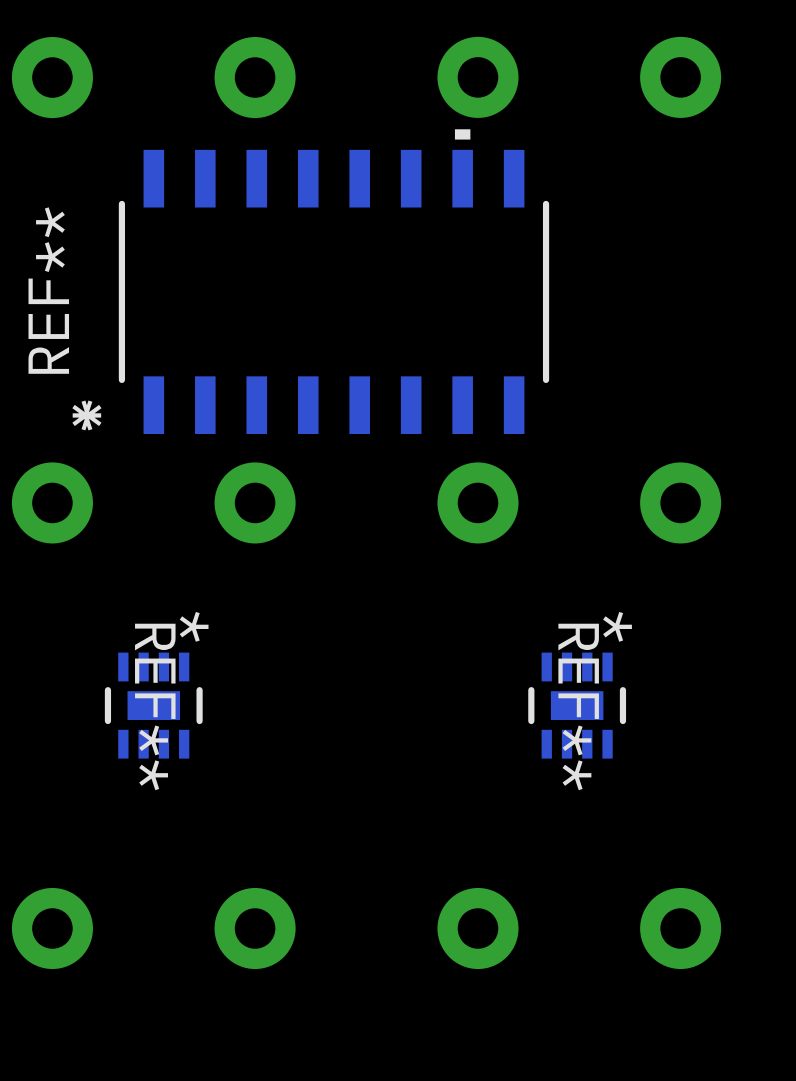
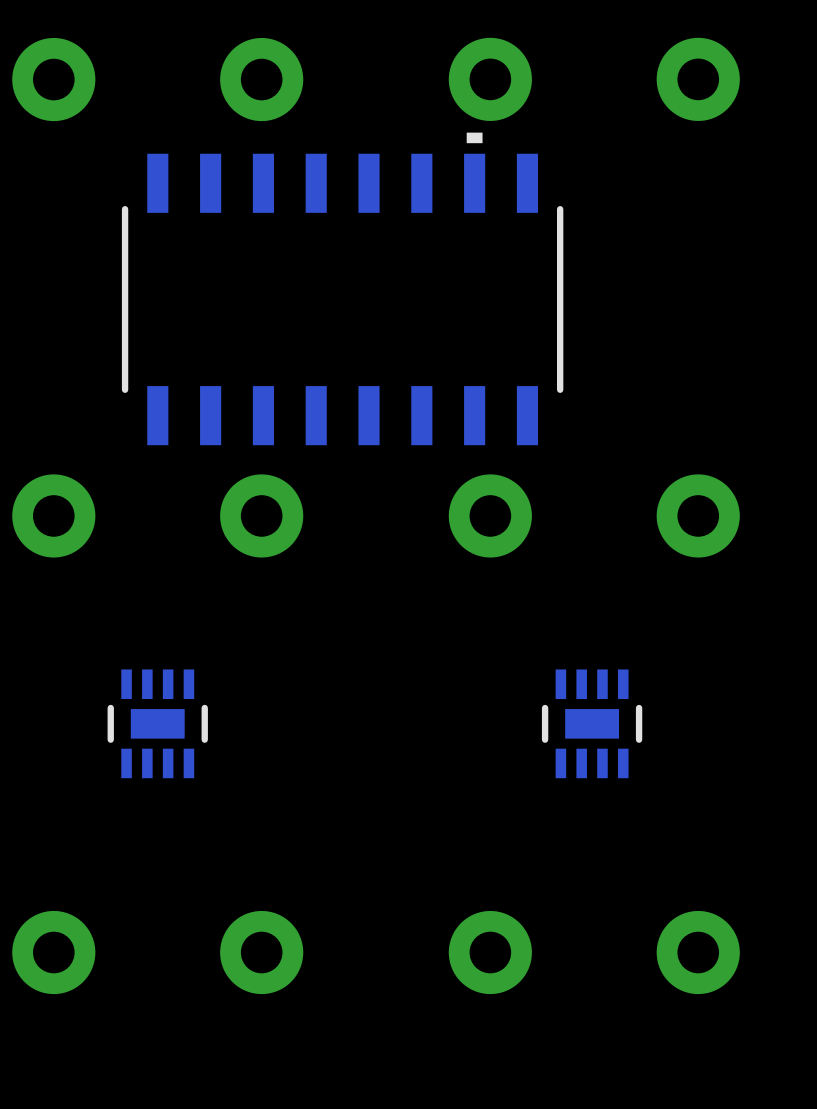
REF** footprint: [118, 129, 550, 434] -> [121, 132, 564, 446]
REF** name: REF** (48, 290) -> none
REF** text: * (194, 626) -> none
REF** text: * (617, 626) -> none
REF** name: REF** (155, 706) -> none
REF** name: REF** (578, 706) -> none

